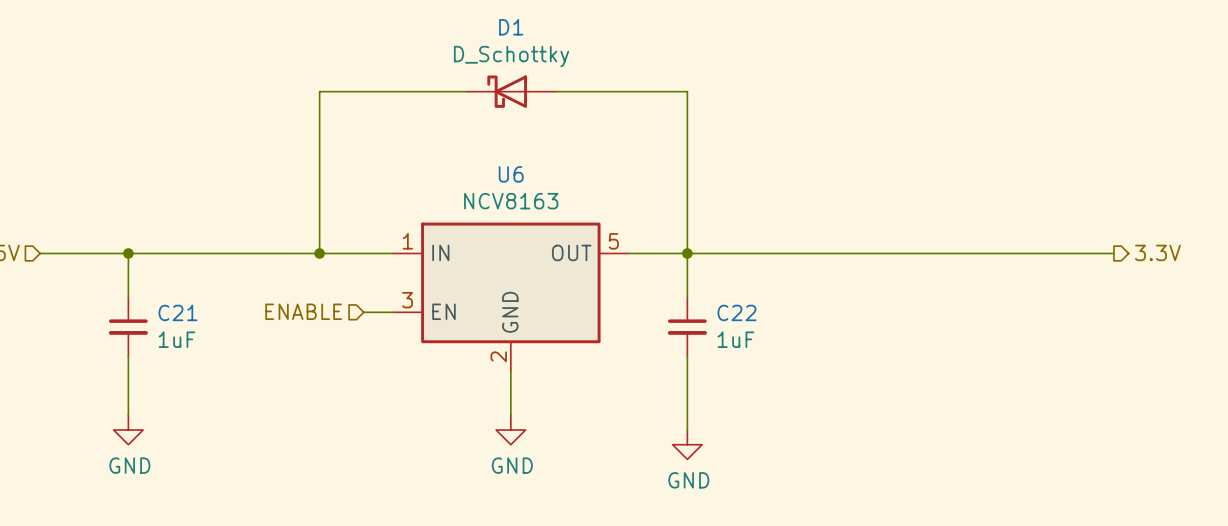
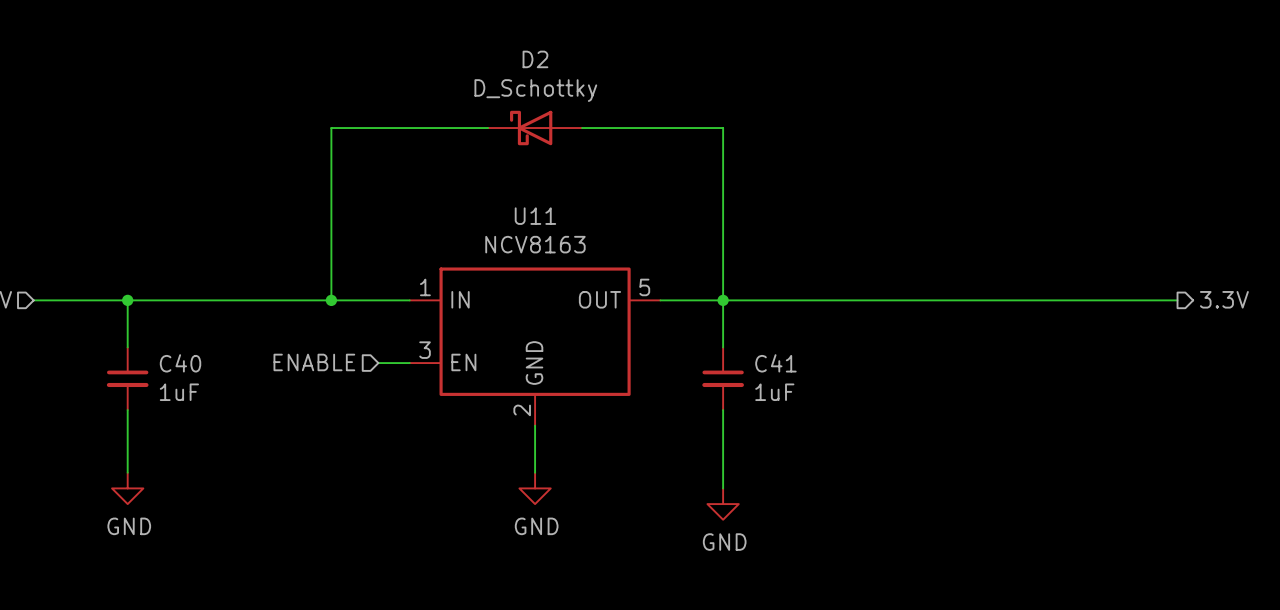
D1 name: D1 (511, 27) -> D2 (535, 59)
U6 name: U6 (511, 174) -> U11 (535, 216)
C21 name: C21 (177, 312) -> C40 (180, 363)
C22 name: C22 (736, 312) -> C41 (775, 363)

